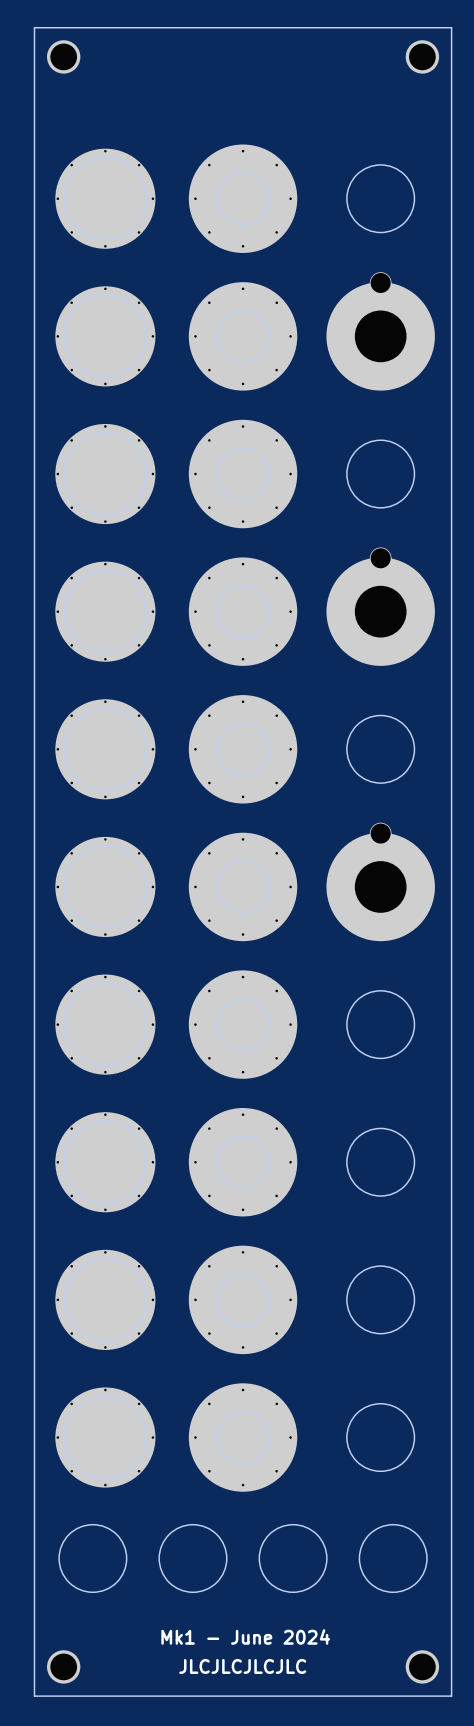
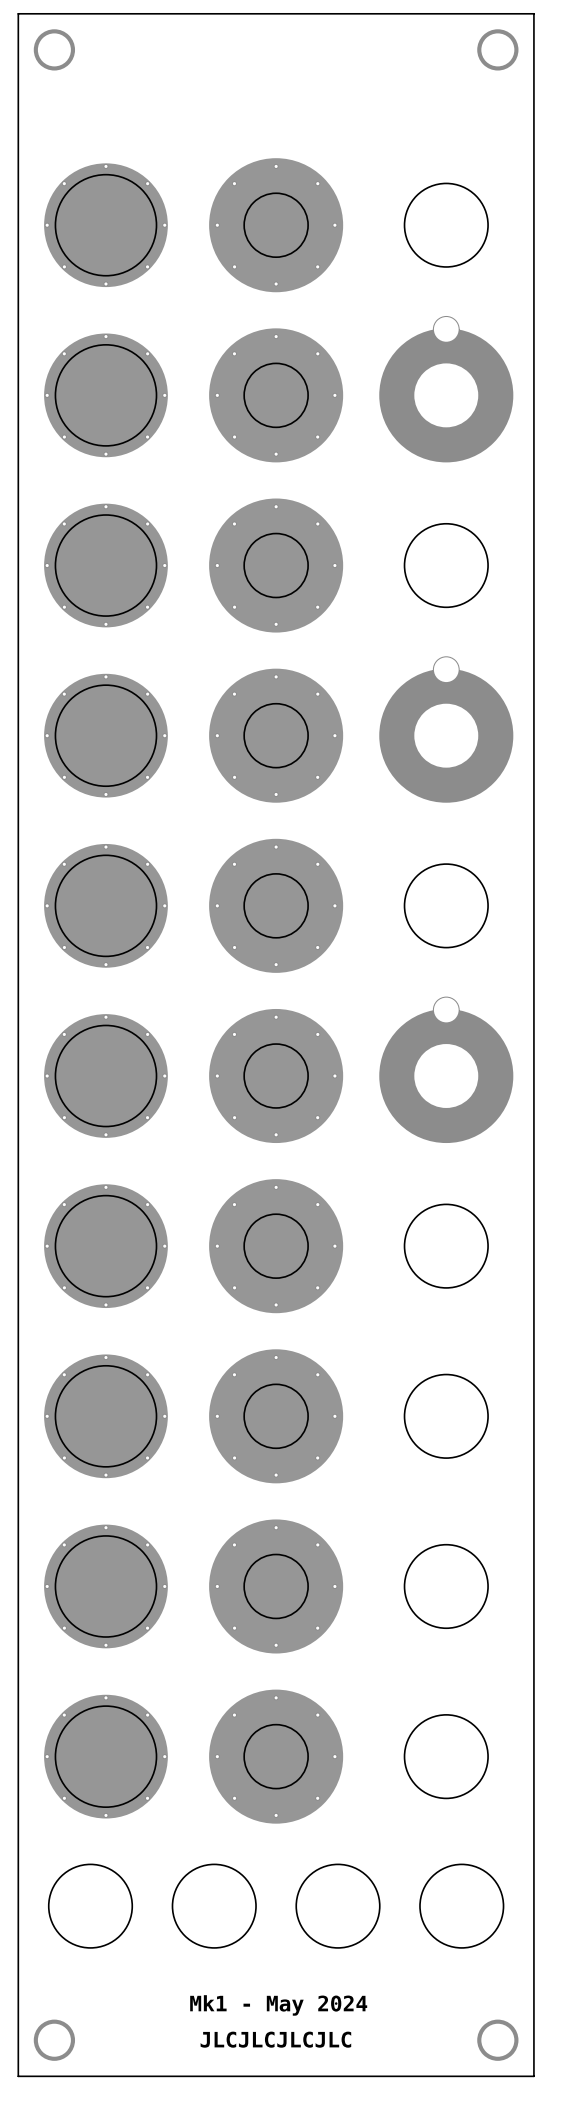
text: Mk1 - June 2024 (245, 1636) -> Mk1 - May 2024 (278, 2005)

